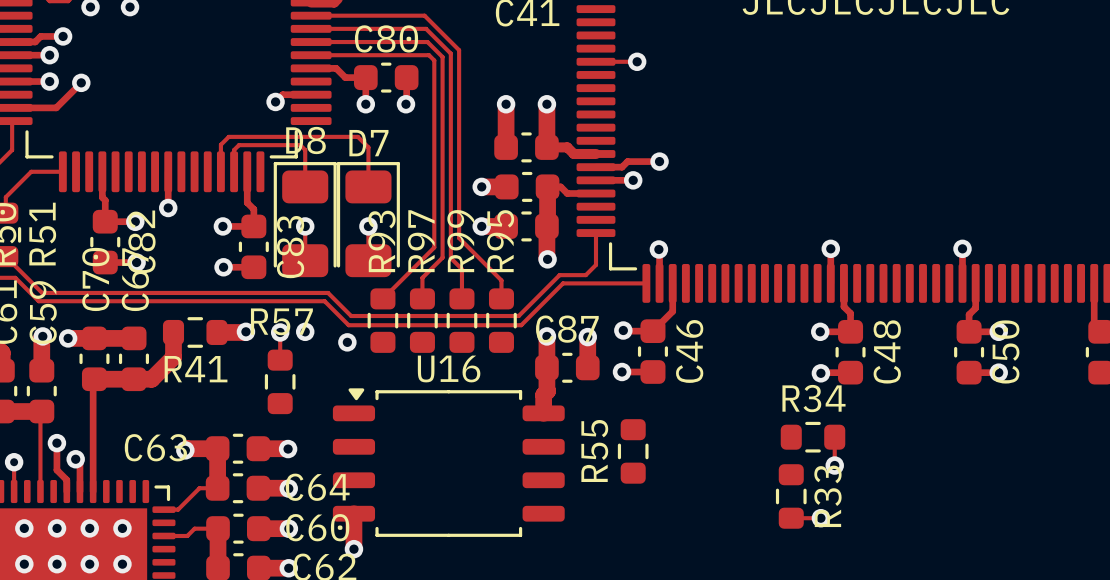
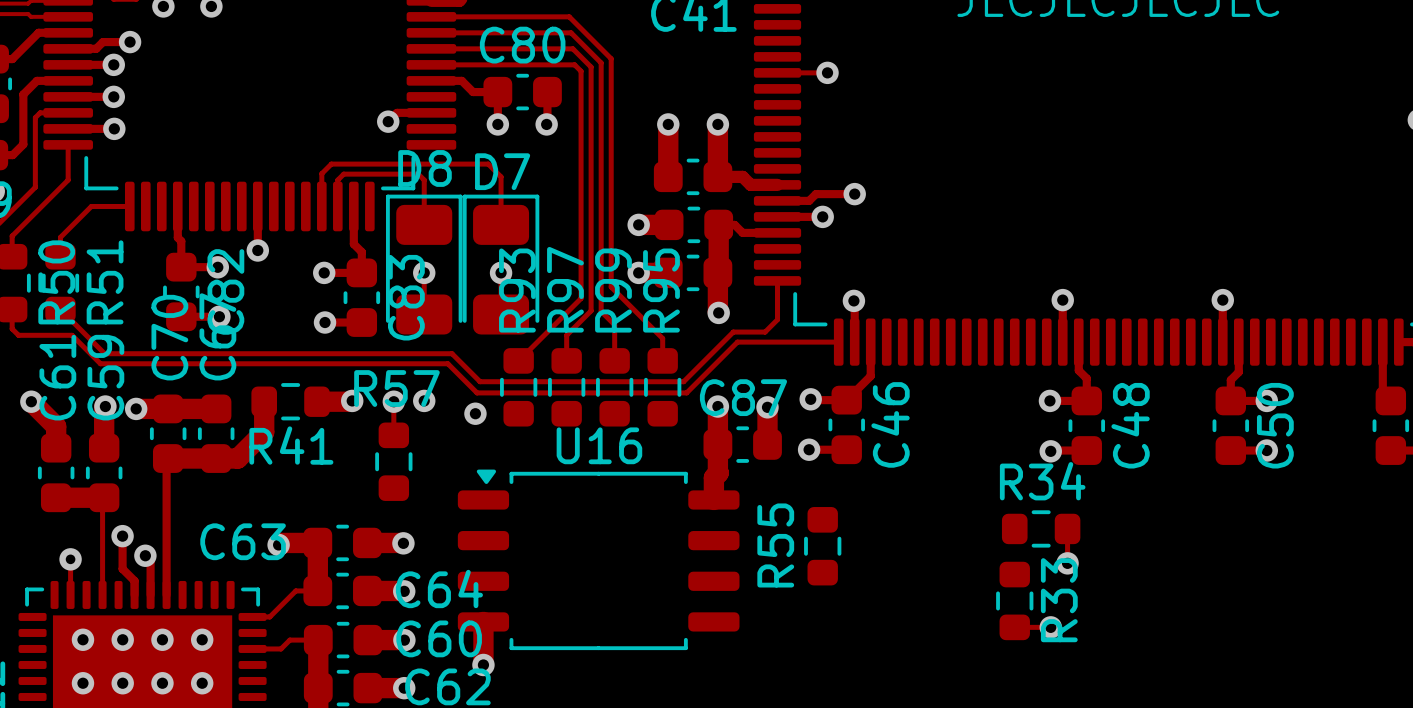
track: (81, 82) (56, 107) (50, 107) -> none
via position: (81, 82) -> (114, 128)

